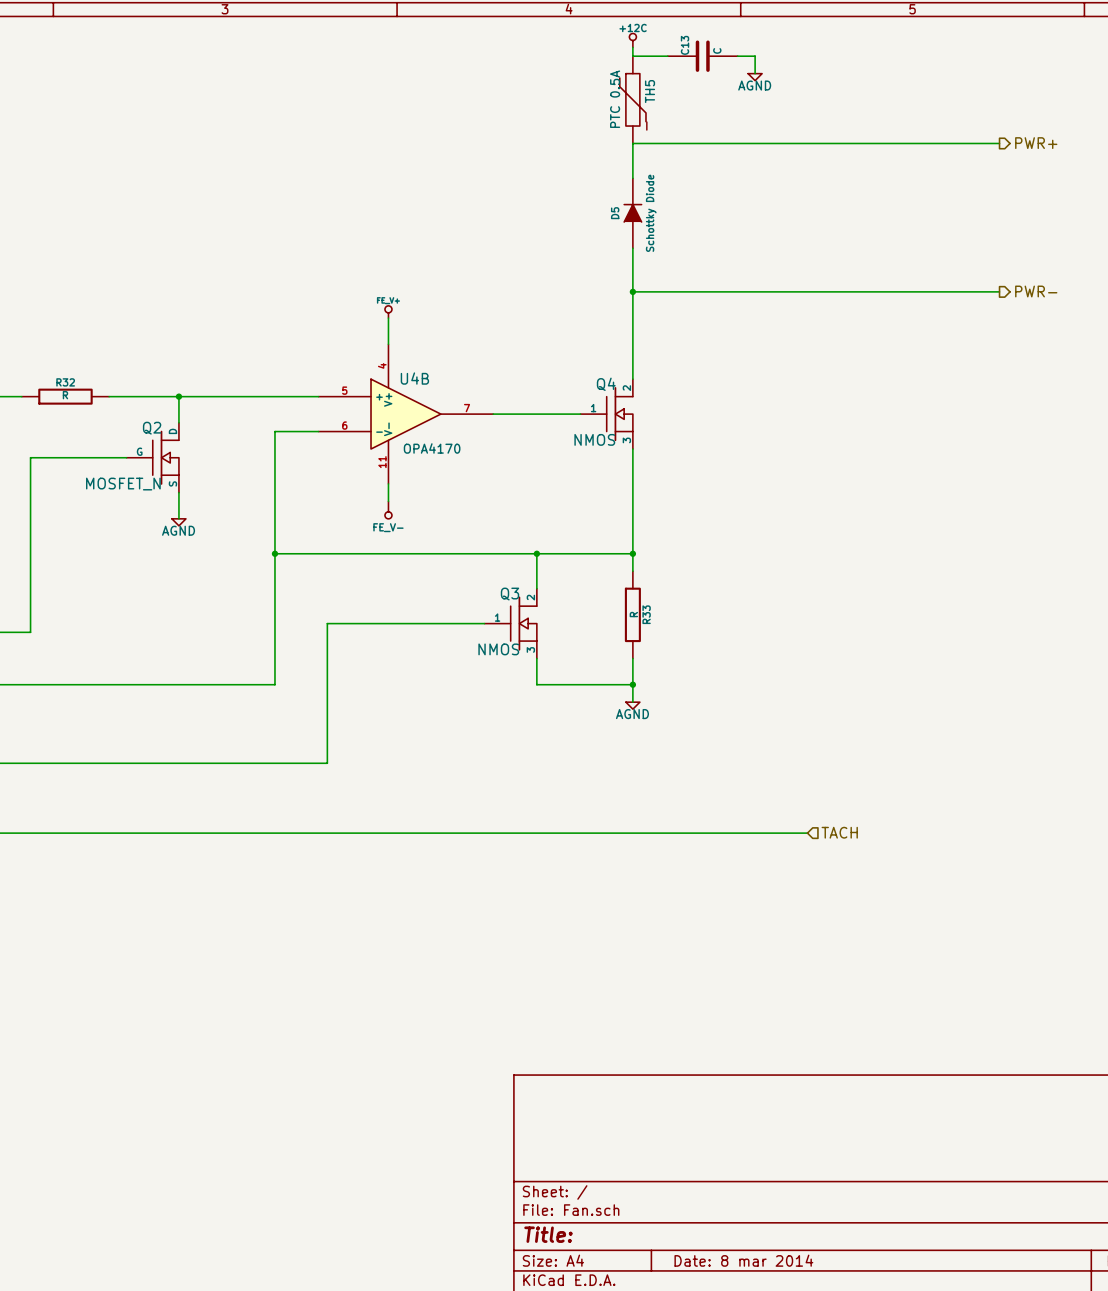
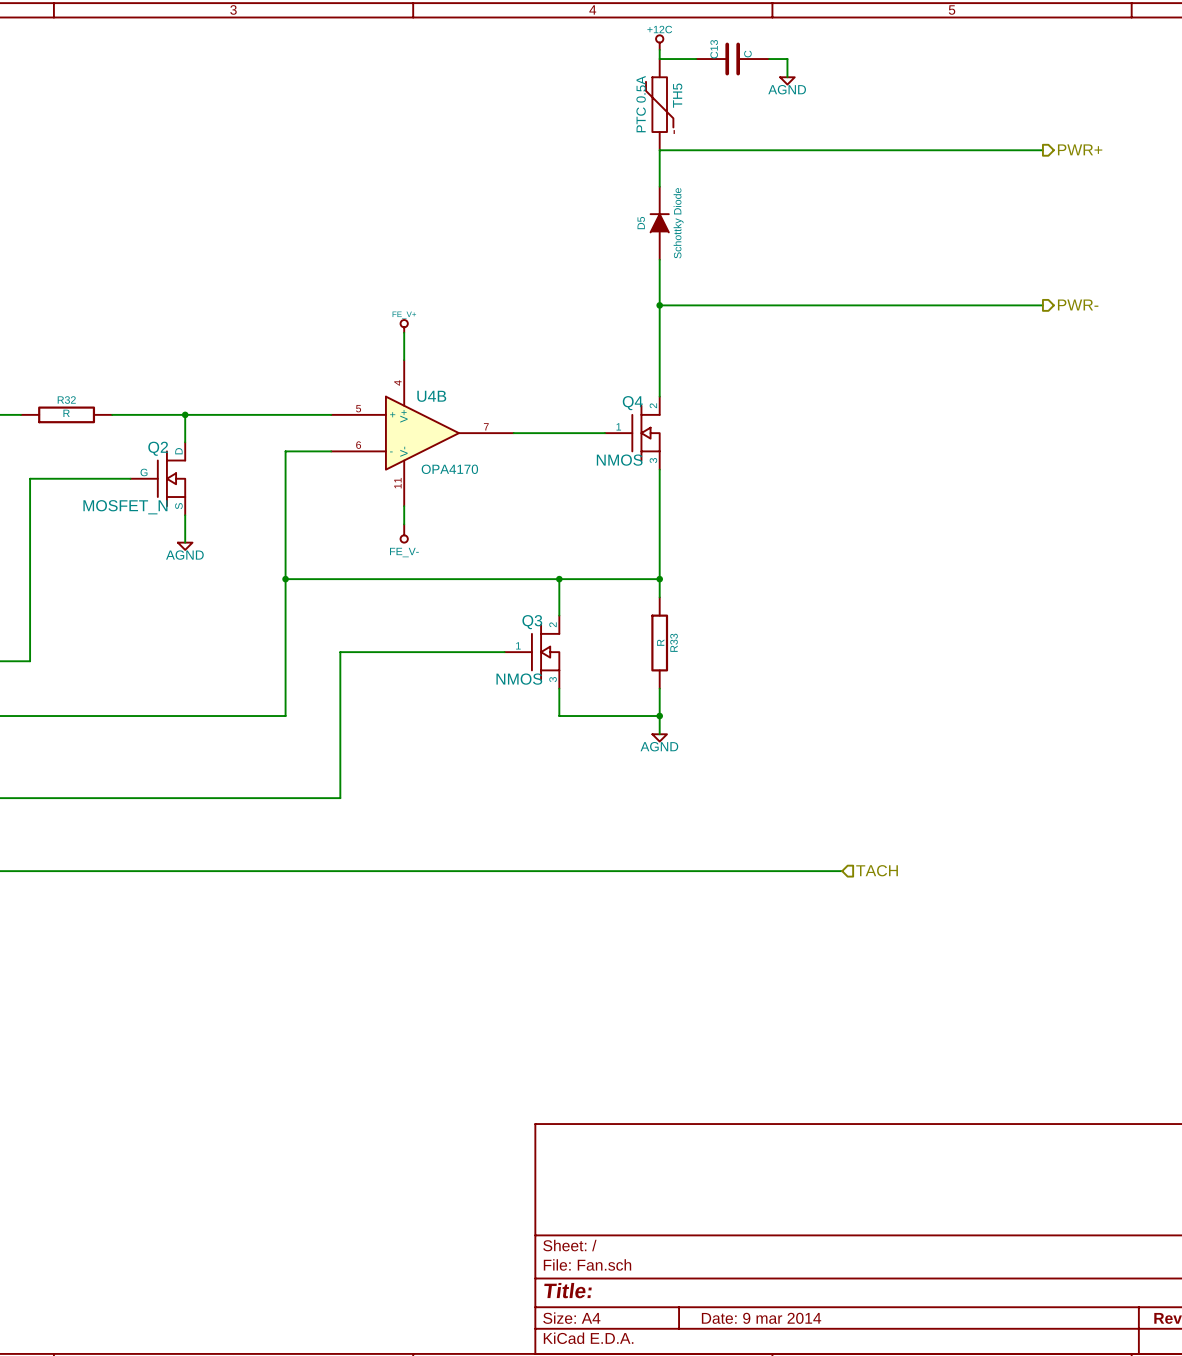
title block: Date: 8 mar 2014 (743, 1260) -> Date: 9 mar 2014 (761, 1318)

